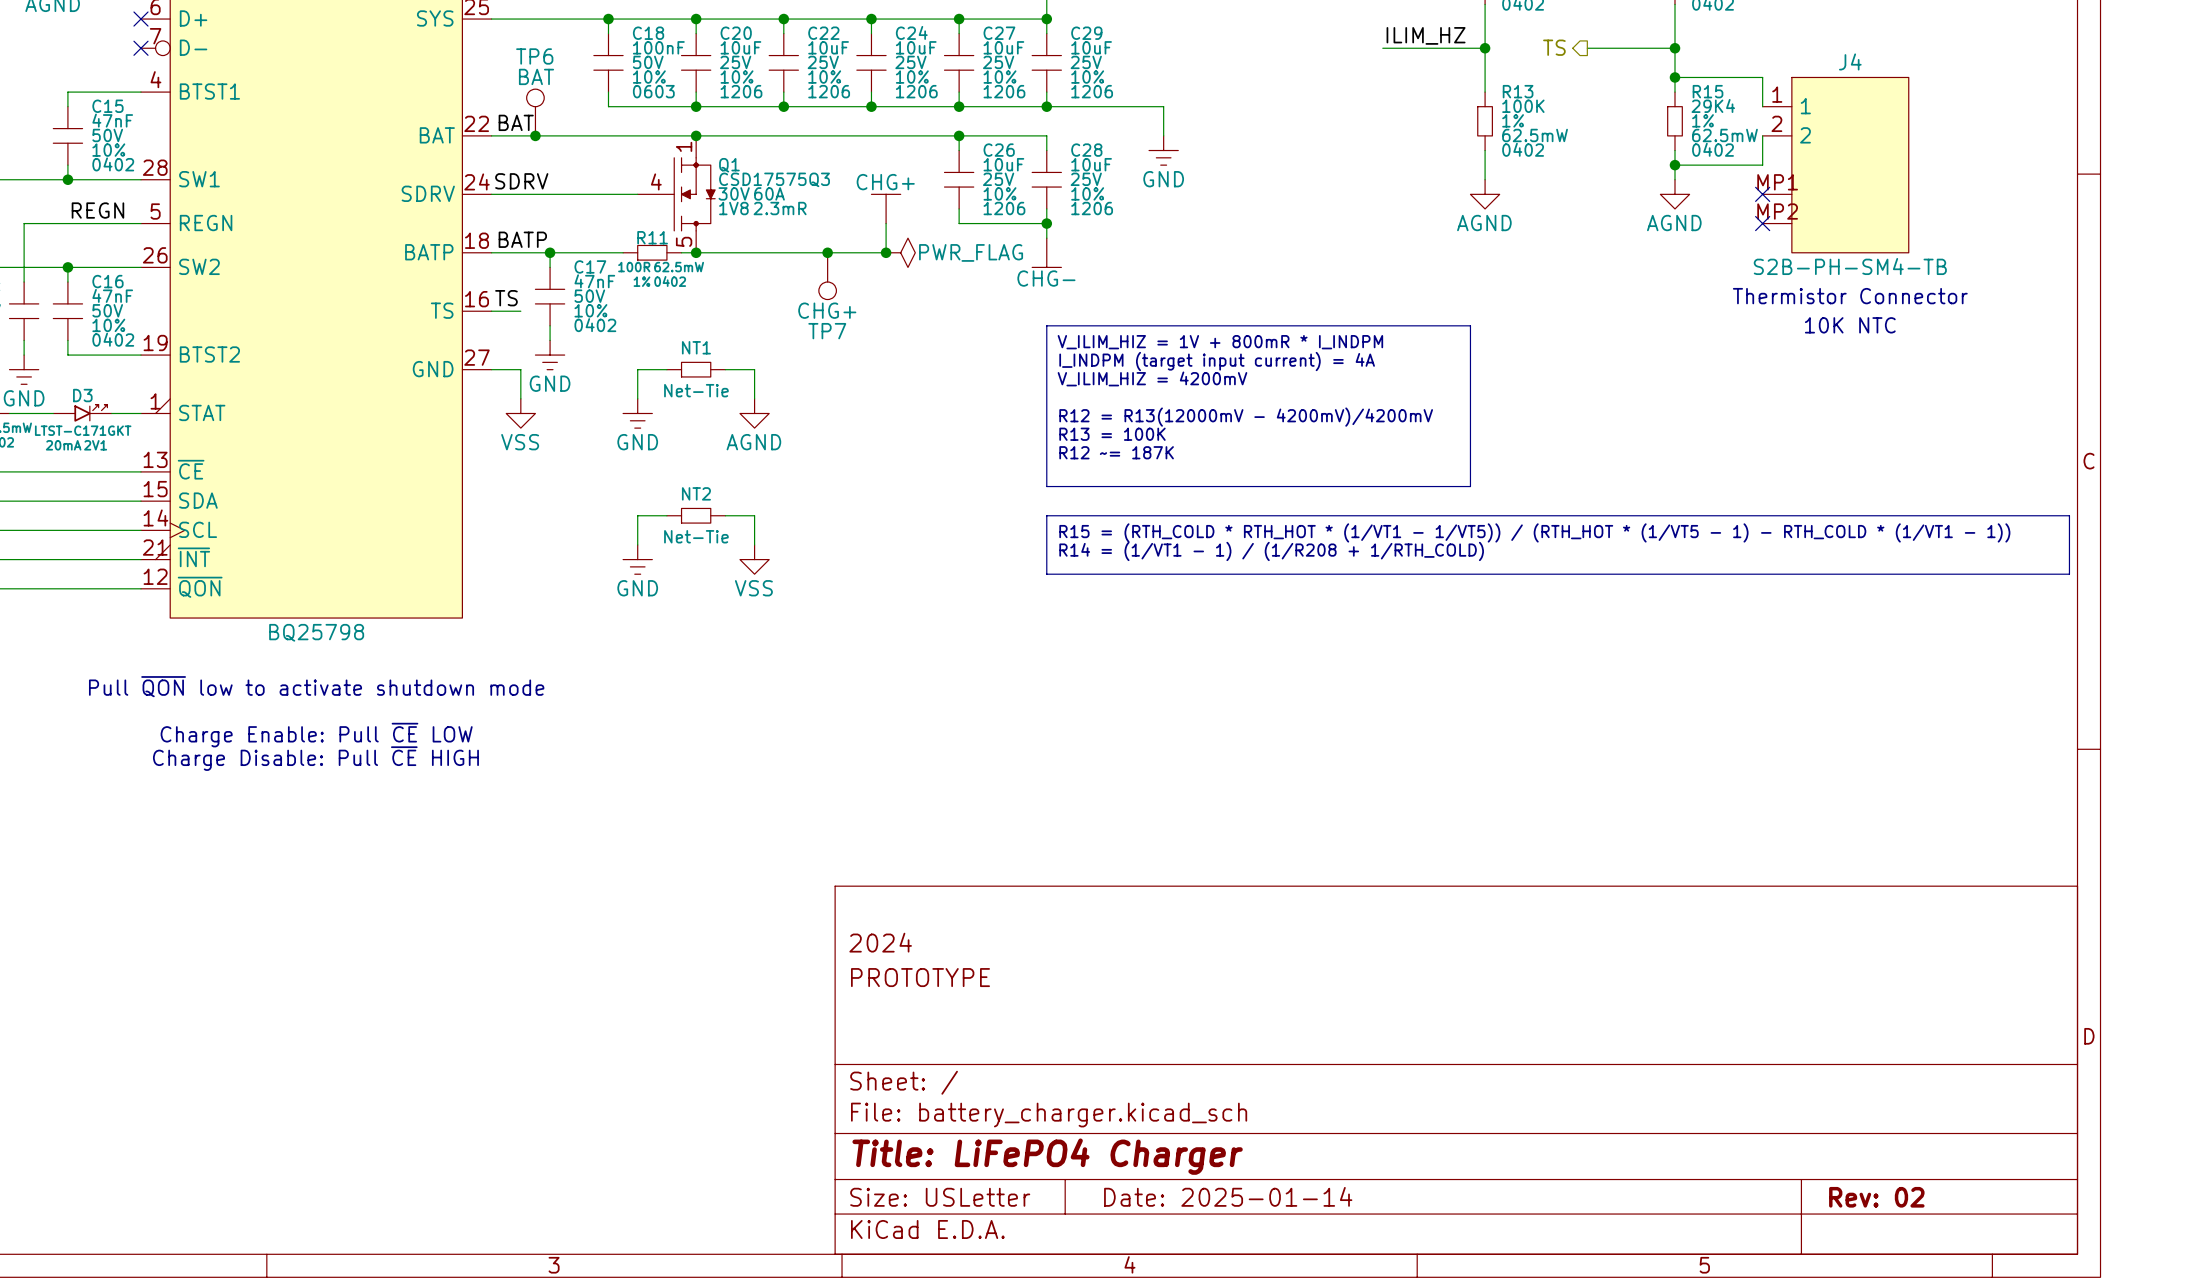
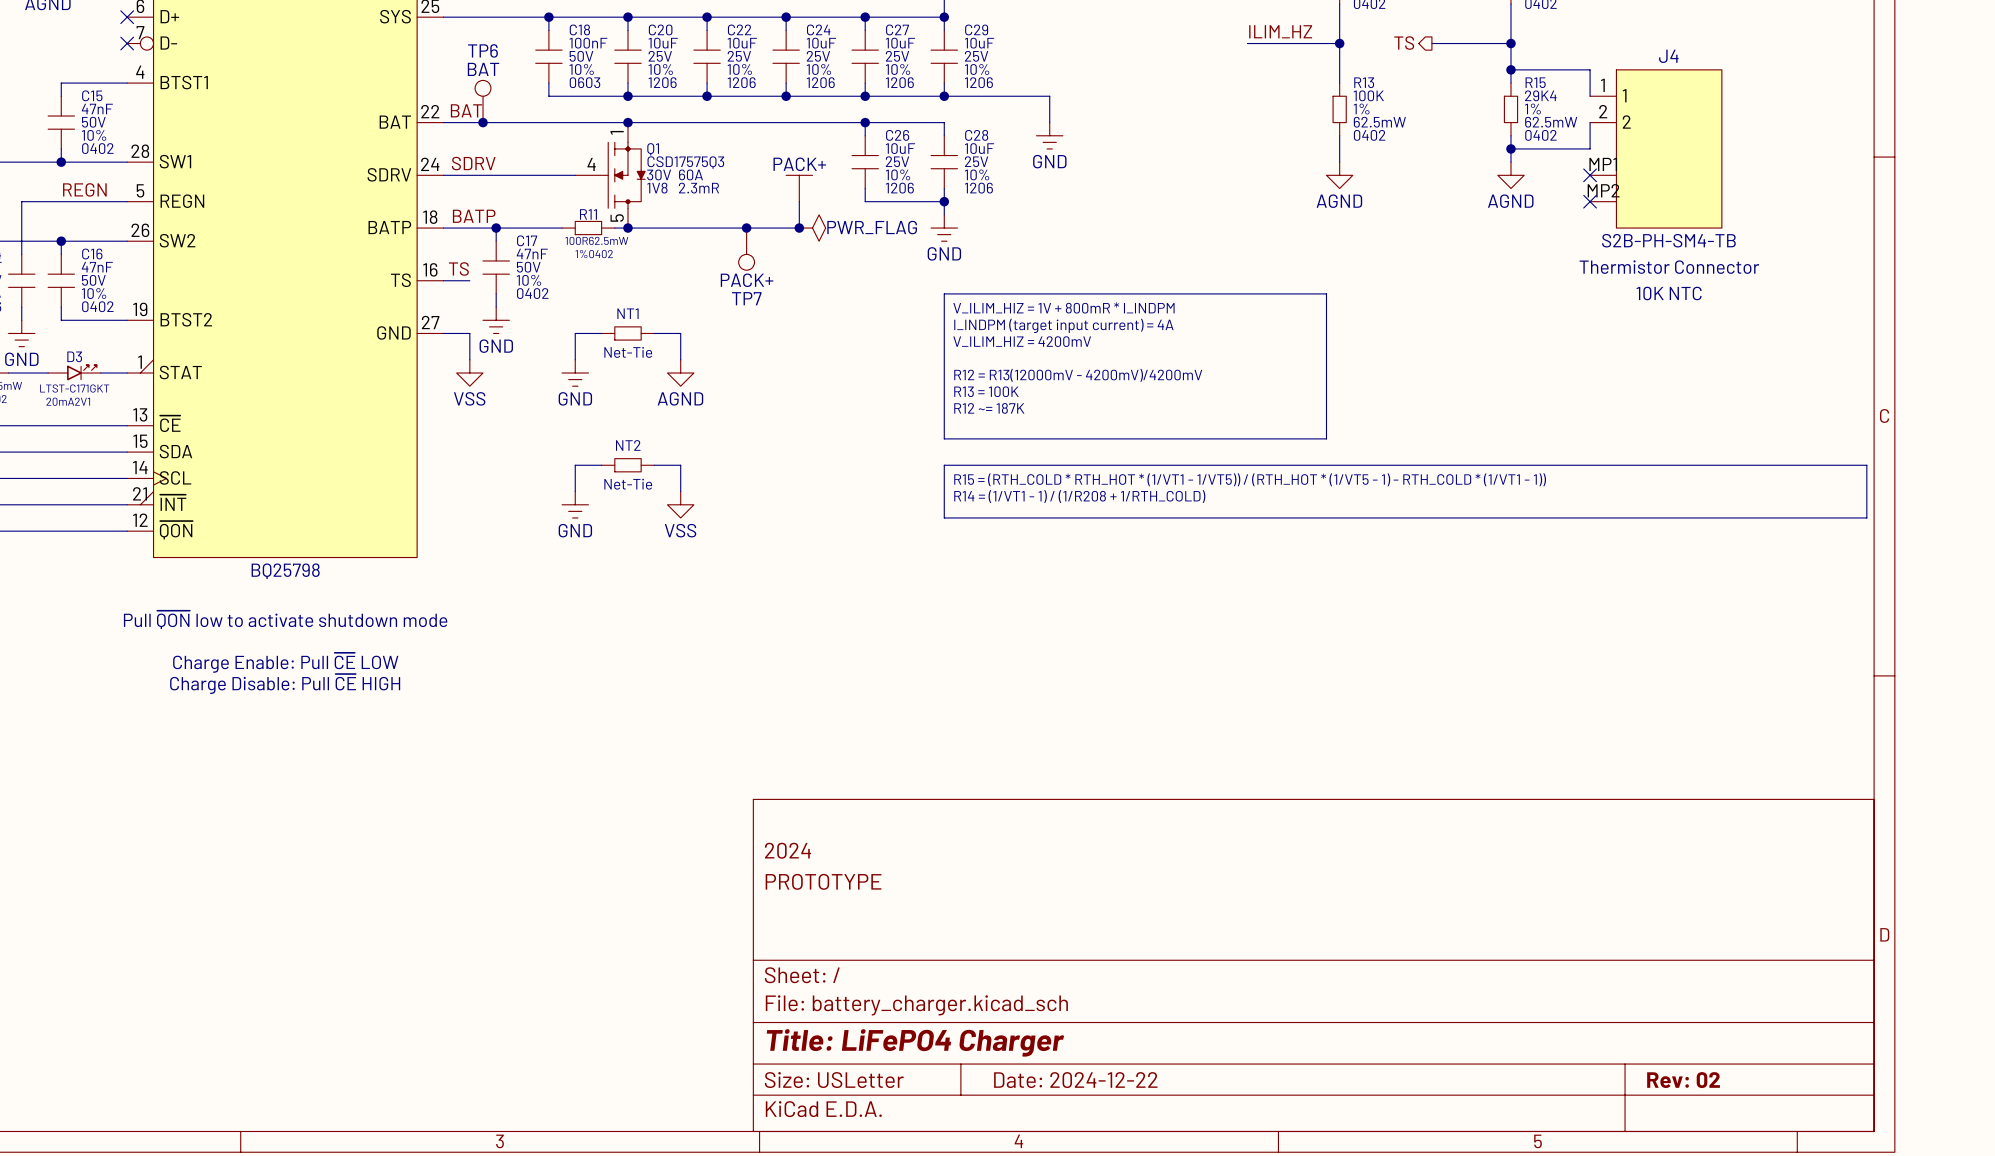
power symbol: CHG+ (886, 208) -> PACK+ (799, 188)
power symbol: CHG- (1046, 252) -> GND (944, 228)
TP7 value: CHG+ (827, 310) -> PACK+ (747, 280)
title block: Date: 2025-01-14 (1228, 1196) -> Date: 2024-12-22 (1075, 1080)

